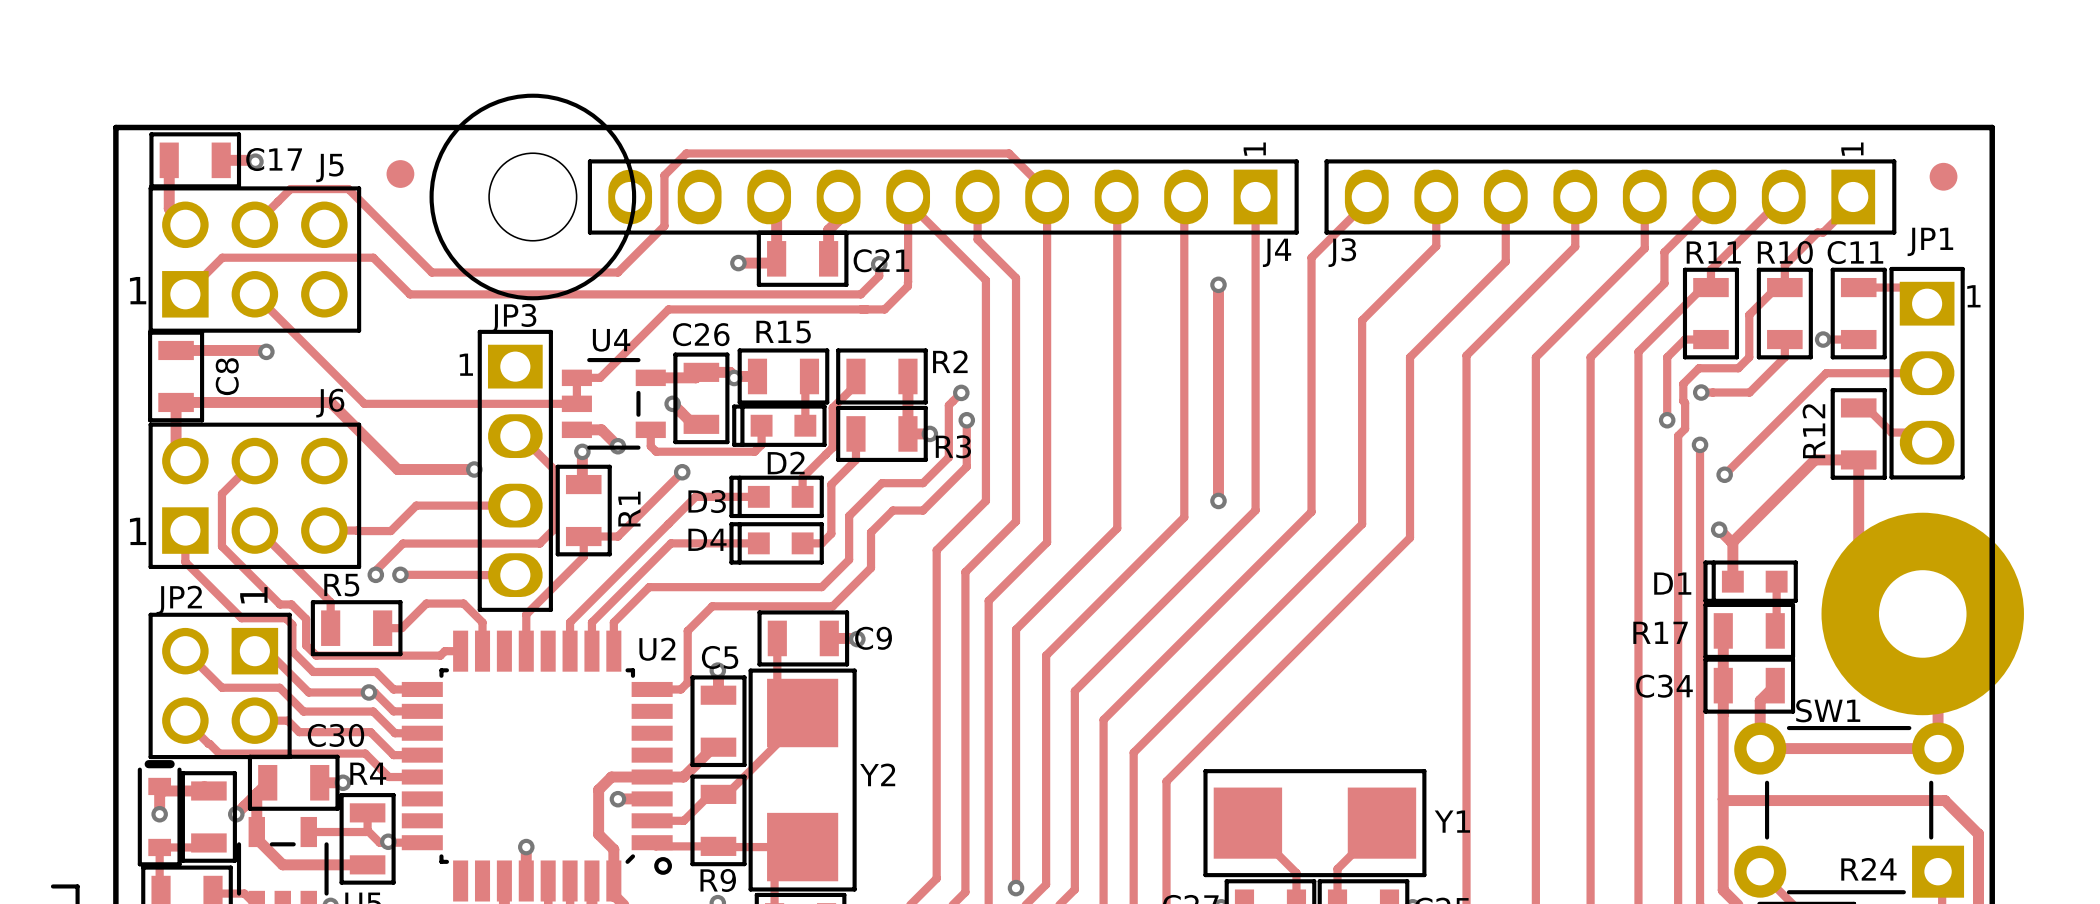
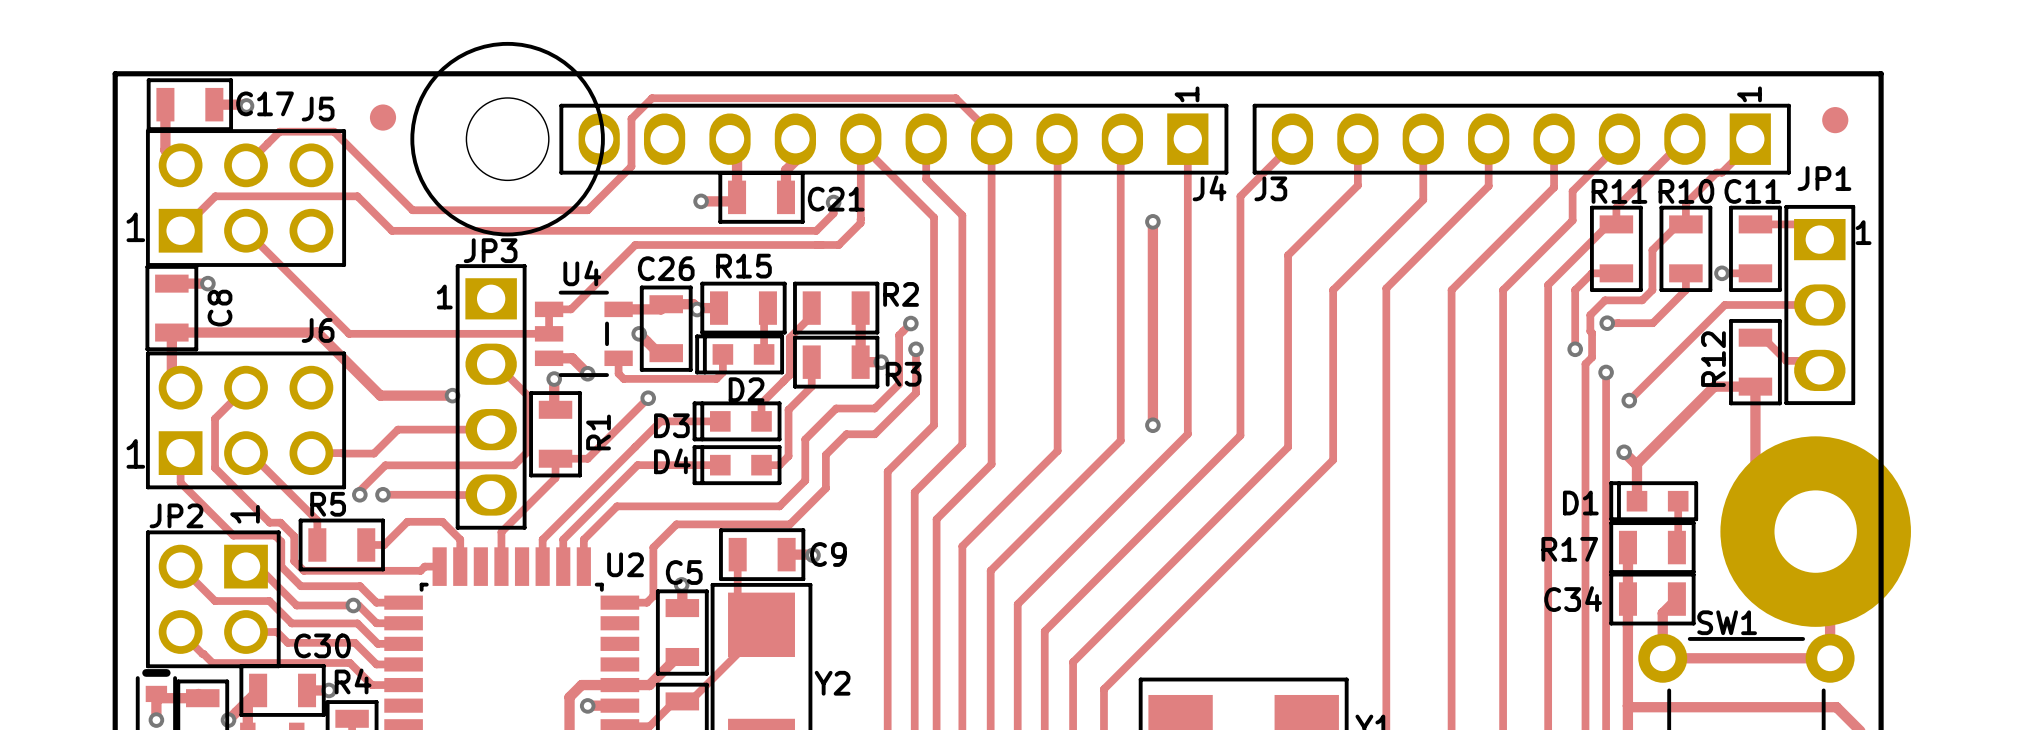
track: (214, 350) (266, 351) -> none
via position: (266, 351) -> (207, 283)

